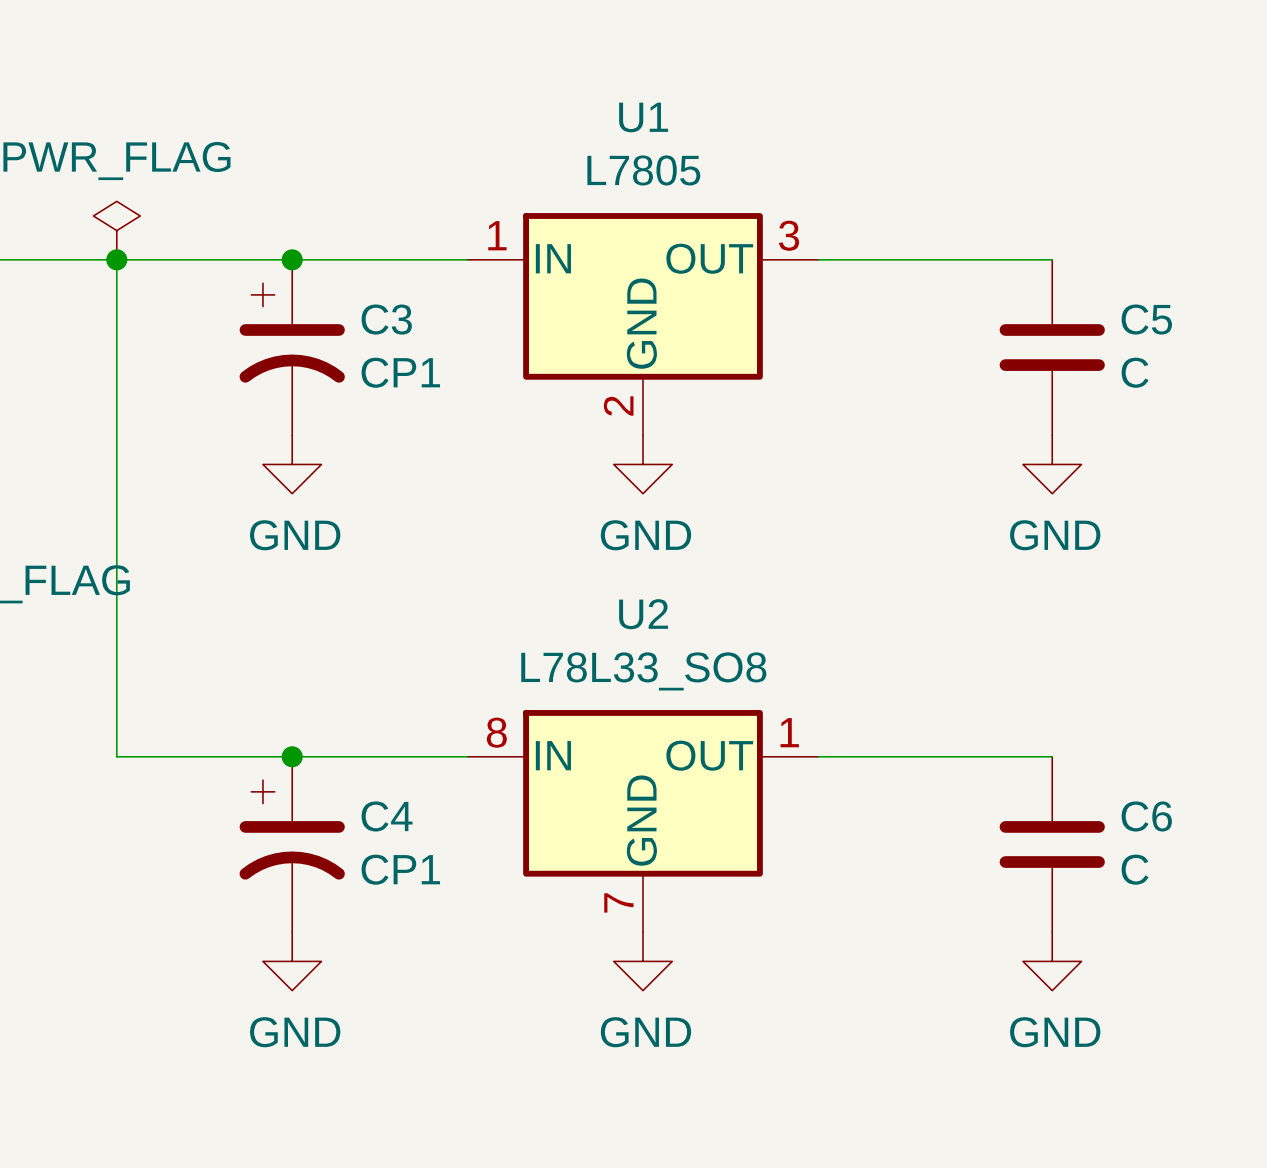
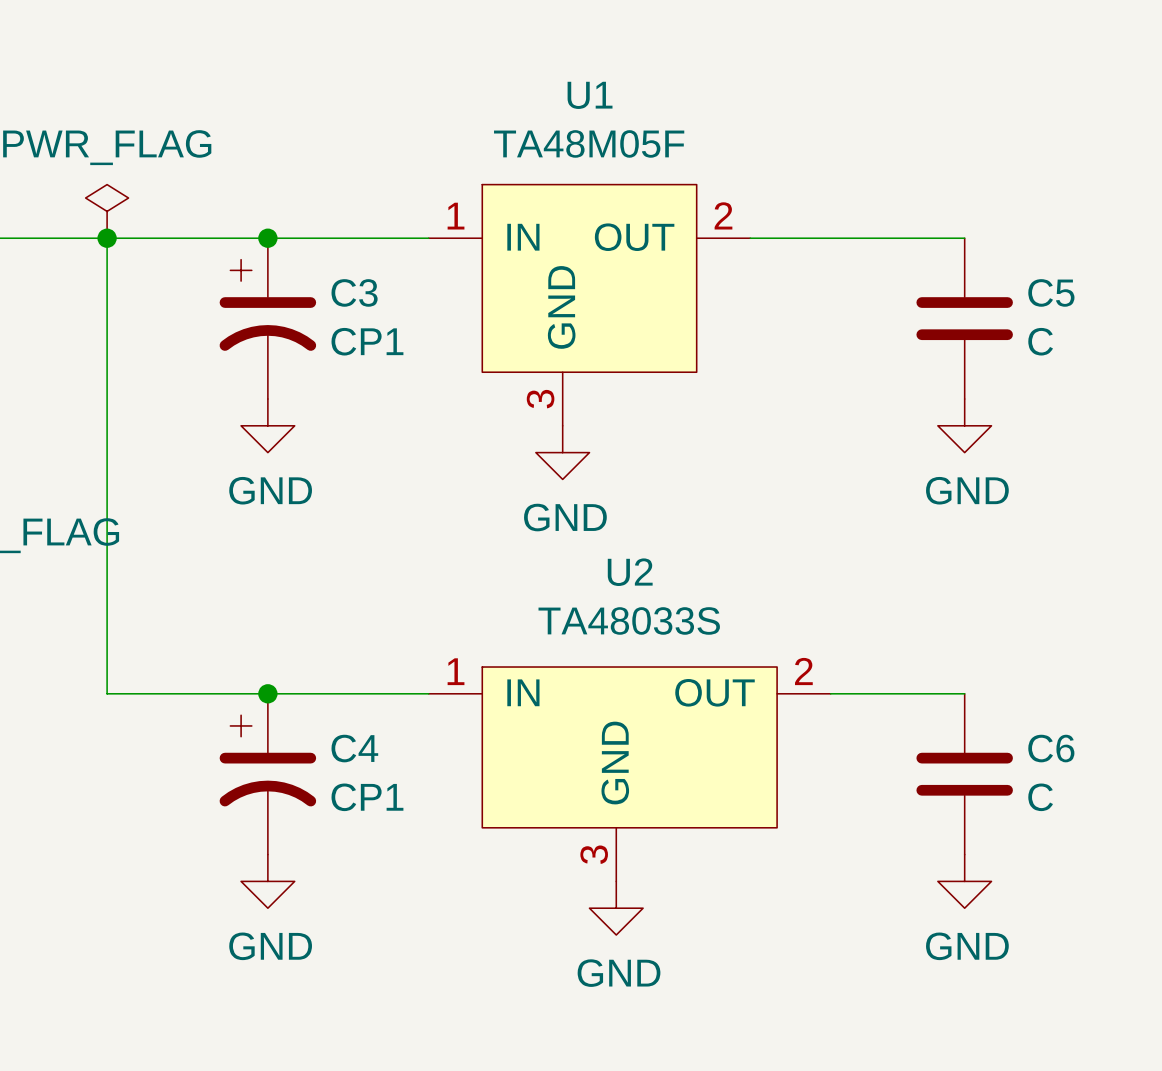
U1 value: L7805 (643, 170) -> TA48M05F (589, 143)
U1 symbol: [467, 213, 819, 436] -> [428, 184, 751, 426]
power symbol position: GND (642, 464) -> GND (562, 452)
U2 value: L78L33_SO8 (643, 671) -> TA48033S (629, 620)
U2 symbol: [467, 710, 819, 933] -> [428, 667, 831, 882]
power symbol position: GND (642, 961) -> GND (616, 908)

